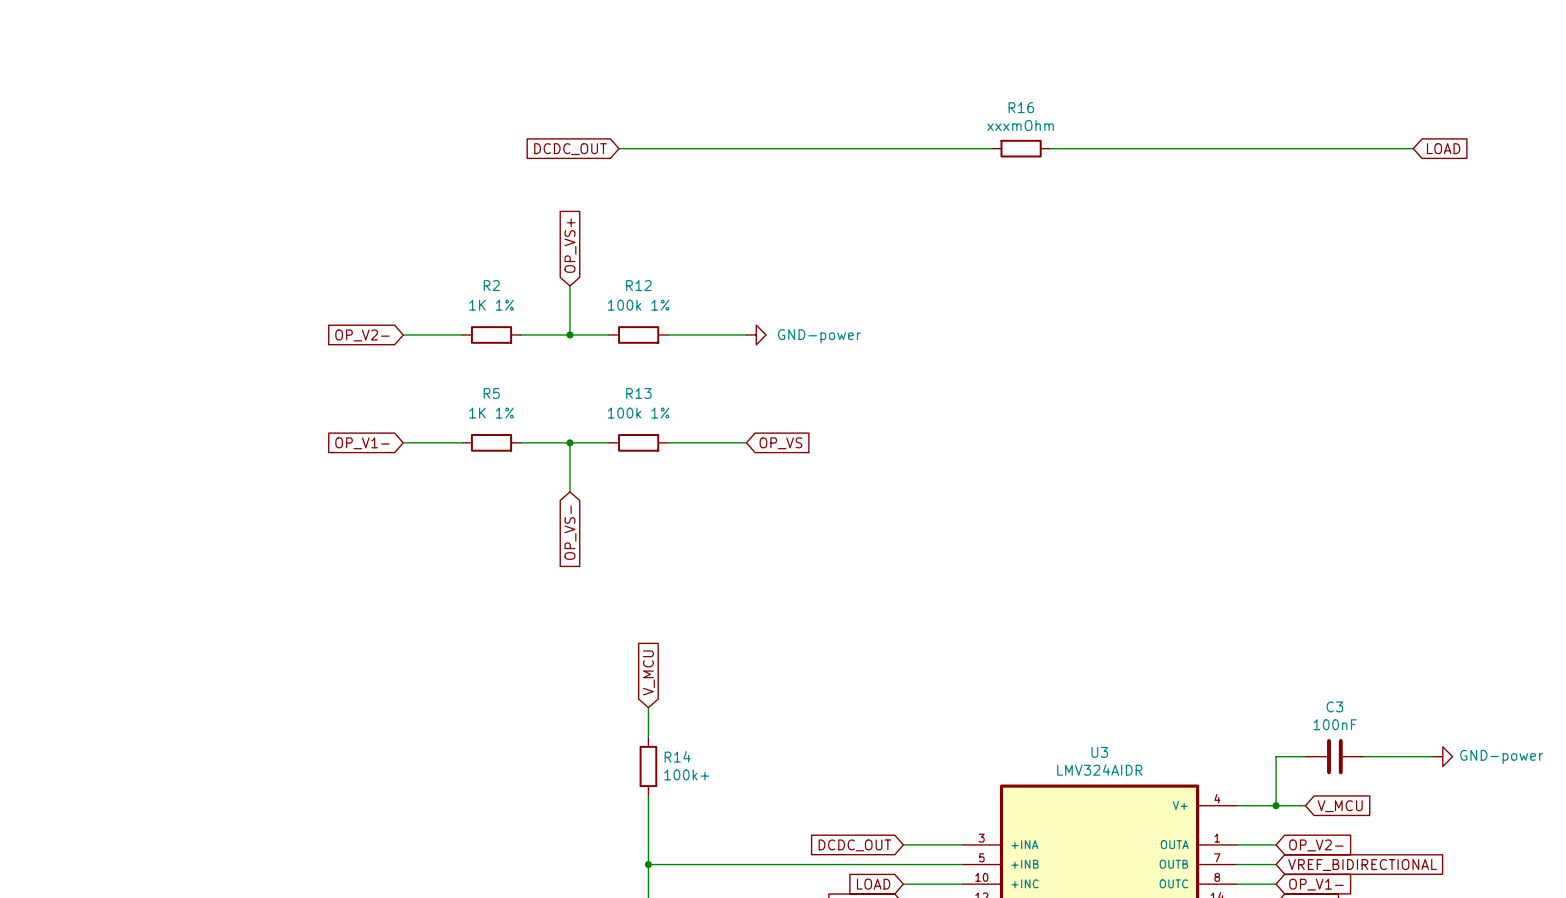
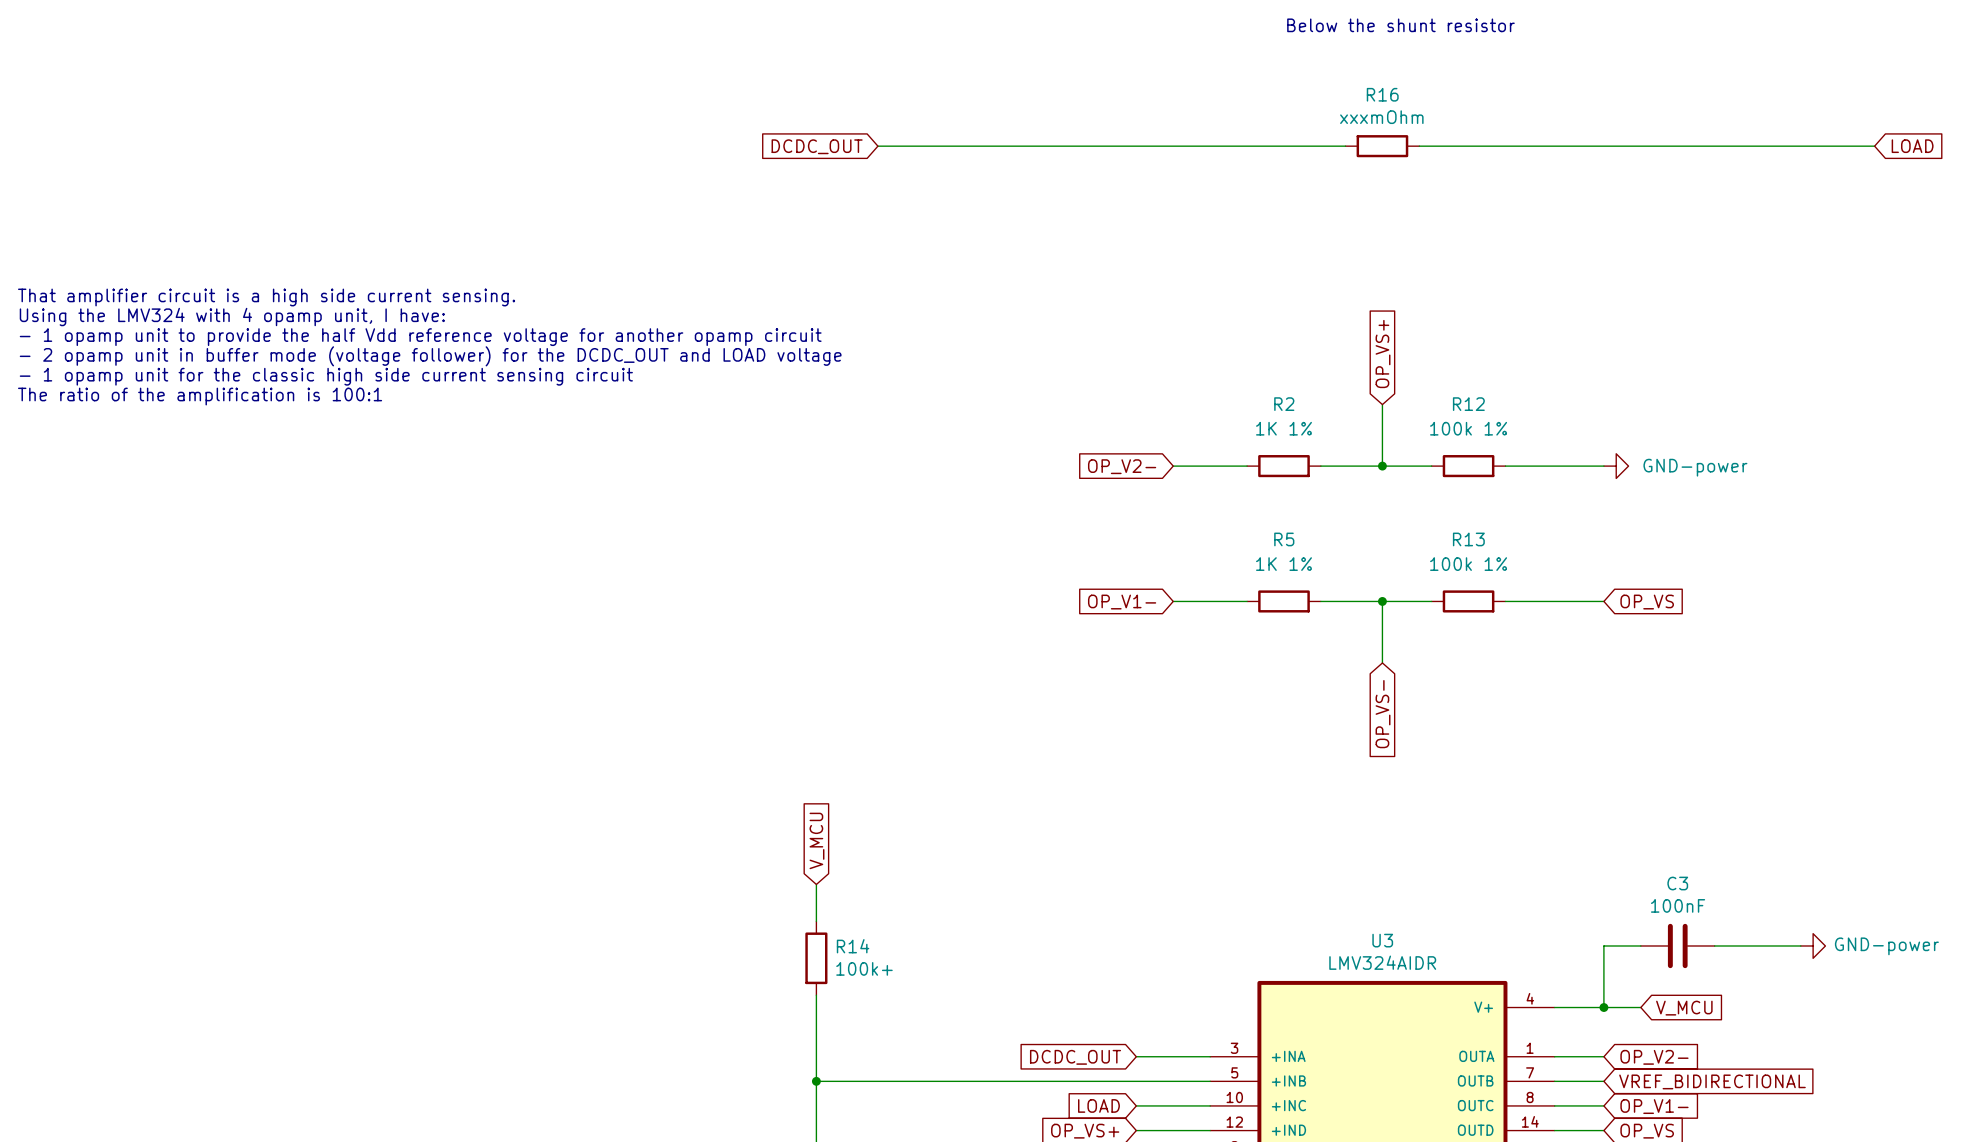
text: none -> Below the shunt resistor (1400, 25)
wire: (619, 148) (991, 148) -> (877, 146) (1345, 146)
R16 position: (1021, 148) -> (1382, 146)
wire: (1050, 148) (1413, 148) -> (1419, 146) (1874, 146)
global label position: LOAD (1443, 148) -> LOAD (1912, 146)
global label position: DCDC_OUT (570, 149) -> DCDC_OUT (817, 146)
text: none -> That amplifier circuit is a high side current sensing. (266, 297)
global label: OP_VS+ (570, 245) -> none
text: none -> Using the LMV324 with 4 opamp unit, I have: (232, 317)
text: none -> - 1 opamp unit to provide the half Vdd reference voltage for another opamp circuit (420, 337)
global label: none -> OP_VS+ (1383, 354)
wire: (569, 285) (569, 334) -> none
text: none -> - 2 opamp unit in buffer mode (voltage follower) for the DCDC_OUT and LOAD voltage (430, 356)
text: none -> - 1 opamp unit for the classic high side current sensing circuit (326, 376)
text: none -> The ratio of the amplification is 100:1 (200, 396)
wire: none -> (1382, 404) (1382, 466)
wire: (403, 334) (462, 334) -> none
R2 position: (491, 334) -> (1283, 466)
wire: (520, 334) (609, 334) -> none
junction: (569, 334) -> none
R12 position: (638, 334) -> (1468, 466)
wire: (668, 334) (746, 334) -> none
power symbol: GND-power (756, 334) -> none
global label: OP_V2- (362, 335) -> none
global label: none -> OP_V2- (1122, 466)
wire: none -> (1173, 466) (1247, 466)
wire: none -> (1320, 466) (1431, 466)
junction: none -> (1382, 466)
wire: none -> (1505, 466) (1603, 466)
power symbol: none -> GND-power (1616, 466)
wire: (403, 442) (462, 442) -> none
R5 position: (491, 442) -> (1283, 601)
wire: (520, 442) (609, 442) -> none
wire: (569, 442) (569, 491) -> none
junction: (569, 442) -> none
R13 position: (638, 442) -> (1468, 601)
wire: (668, 442) (746, 442) -> none
global label: OP_V1- (362, 443) -> none
global label: OP_VS (780, 443) -> none
global label: none -> OP_V1- (1122, 602)
wire: none -> (1173, 601) (1247, 601)
wire: none -> (1320, 601) (1431, 601)
wire: none -> (1382, 601) (1382, 662)
junction: none -> (1382, 601)
wire: none -> (1505, 601) (1603, 601)
global label: none -> OP_VS (1647, 602)
global label: OP_VS- (570, 532) -> none
global label: none -> OP_VS- (1383, 714)

